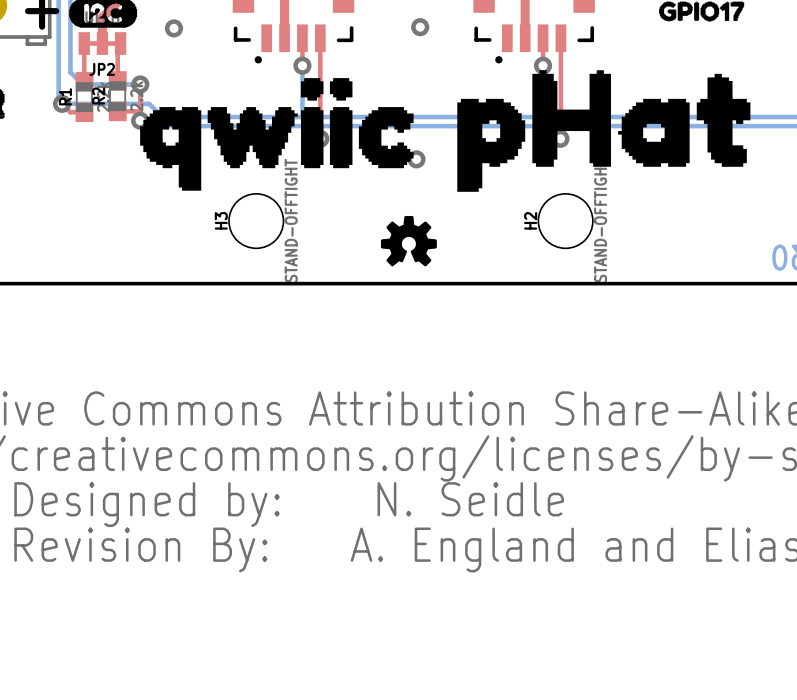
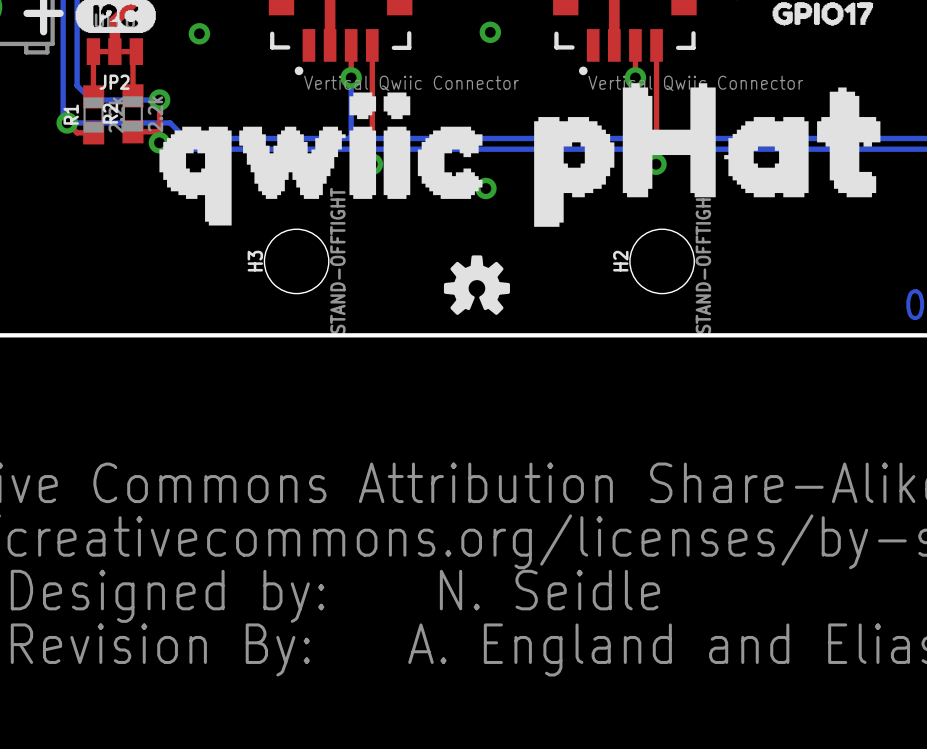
part value: none -> Vertical Qwiic Connector (411, 83)
part value: none -> Vertical Qwiic Connector (695, 83)

